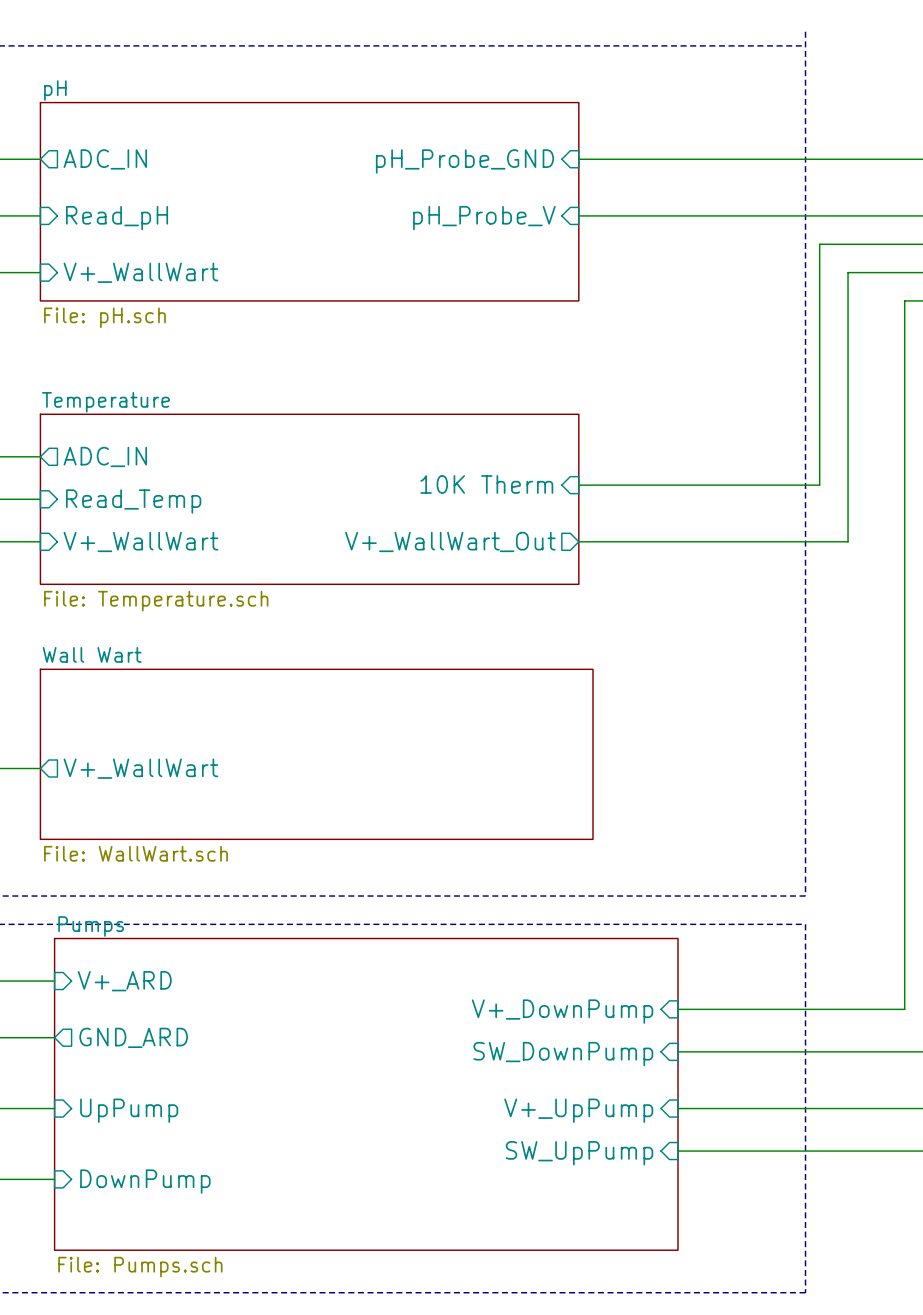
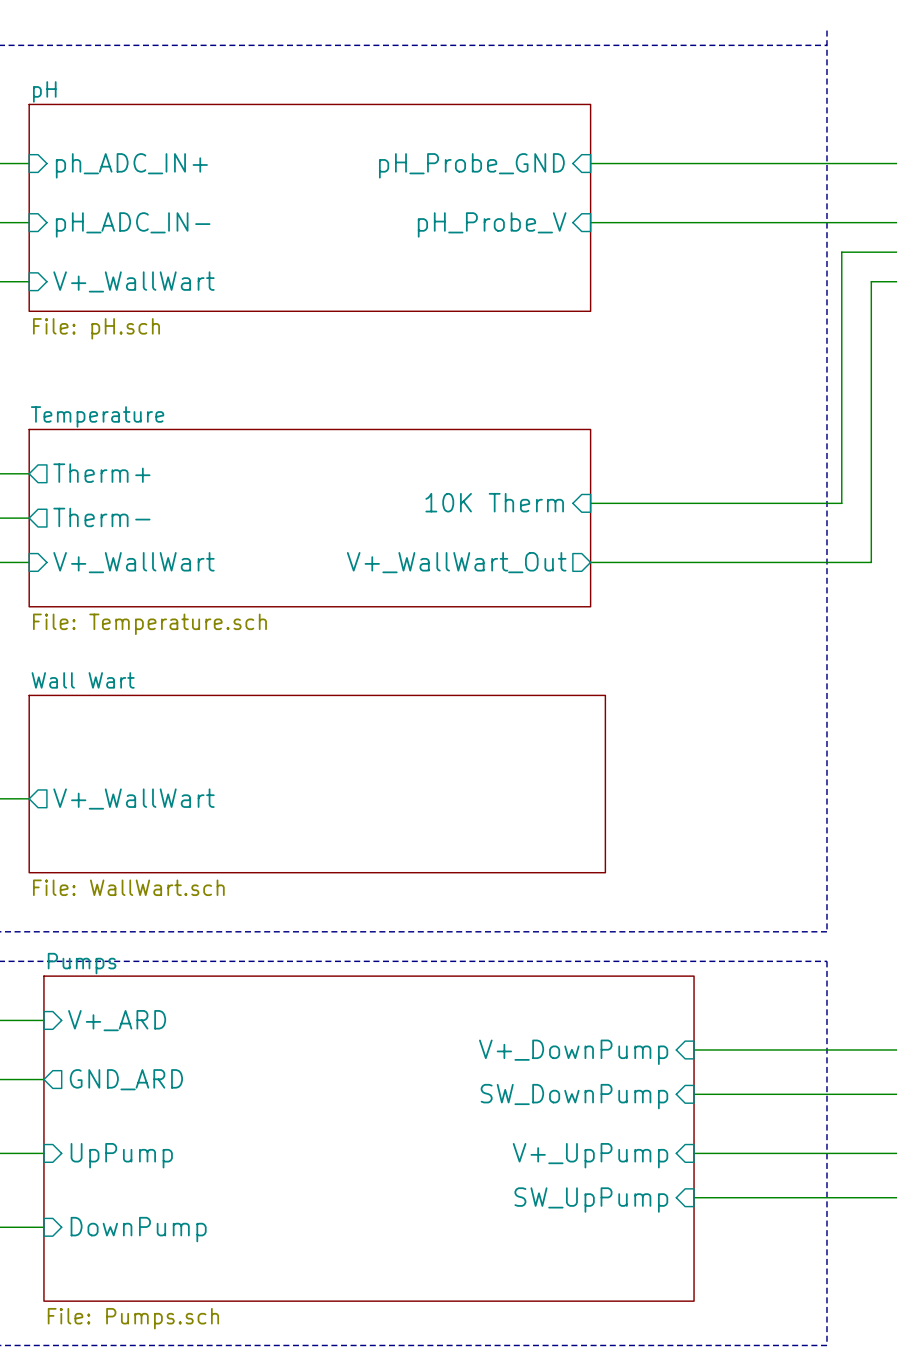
sheet pin shape: output (105, 159) -> input (131, 165)
sheet pin: ADC_IN (105, 159) -> ph_ADC_IN+ (131, 165)
sheet pin: Read_pH (117, 218) -> pH_ADC_IN- (133, 224)
sheet pin: ADC_IN (105, 456) -> Therm+ (101, 473)
sheet pin shape: input (133, 501) -> output (101, 517)
sheet pin: Read_Temp (133, 501) -> Therm- (101, 517)

